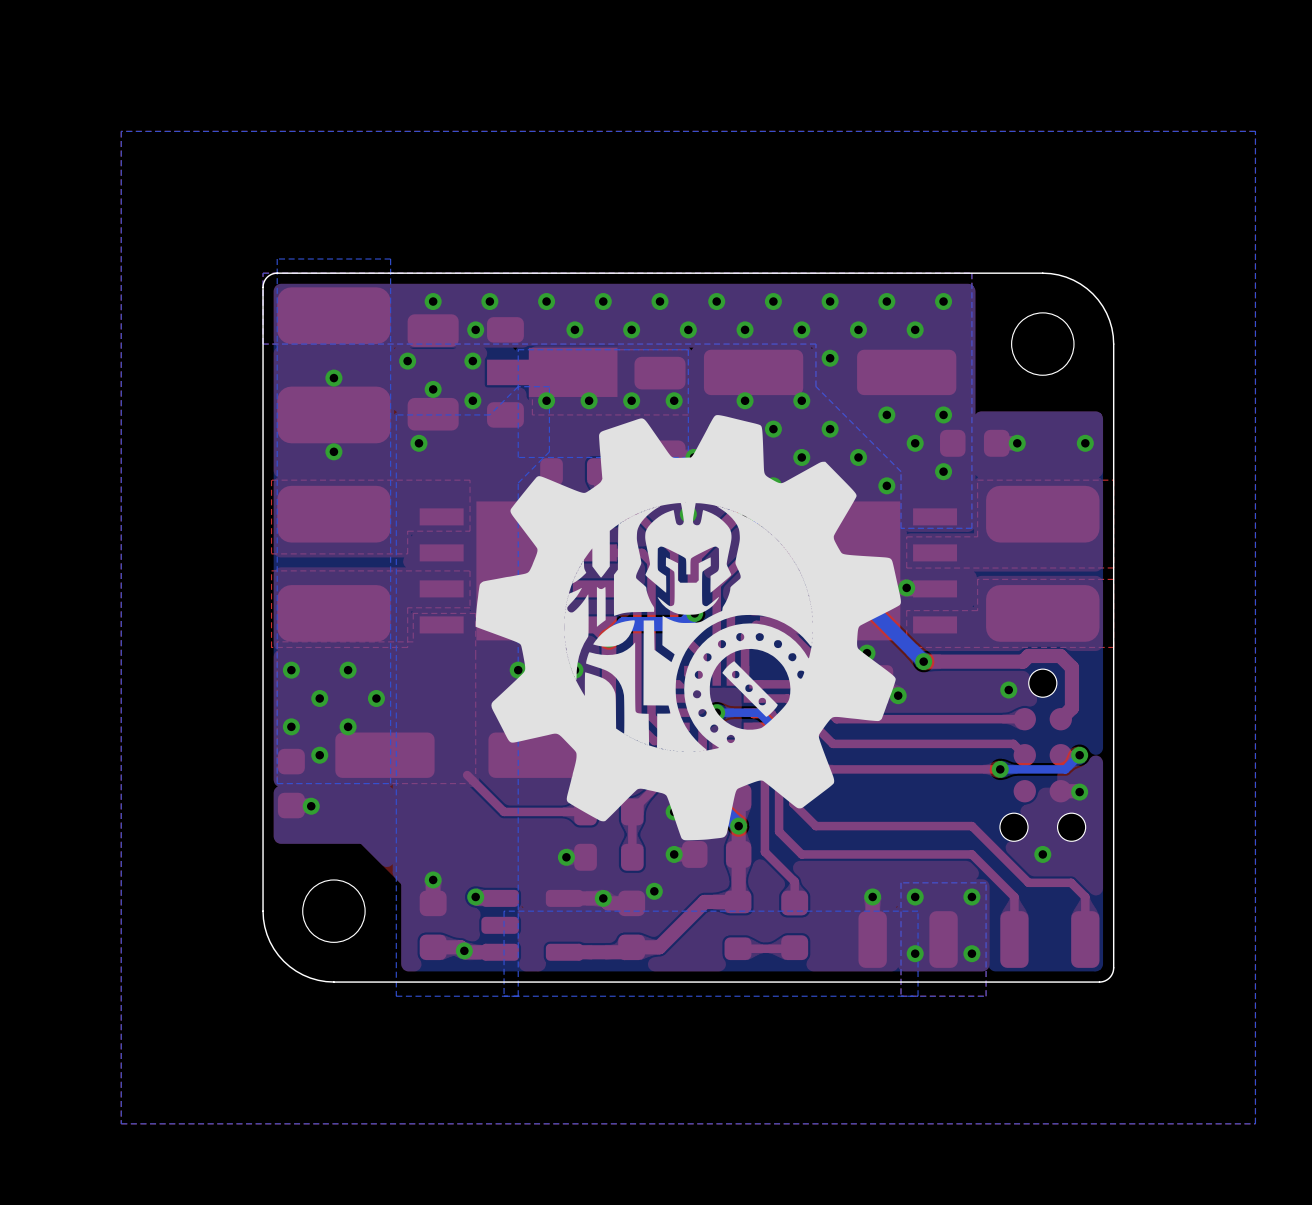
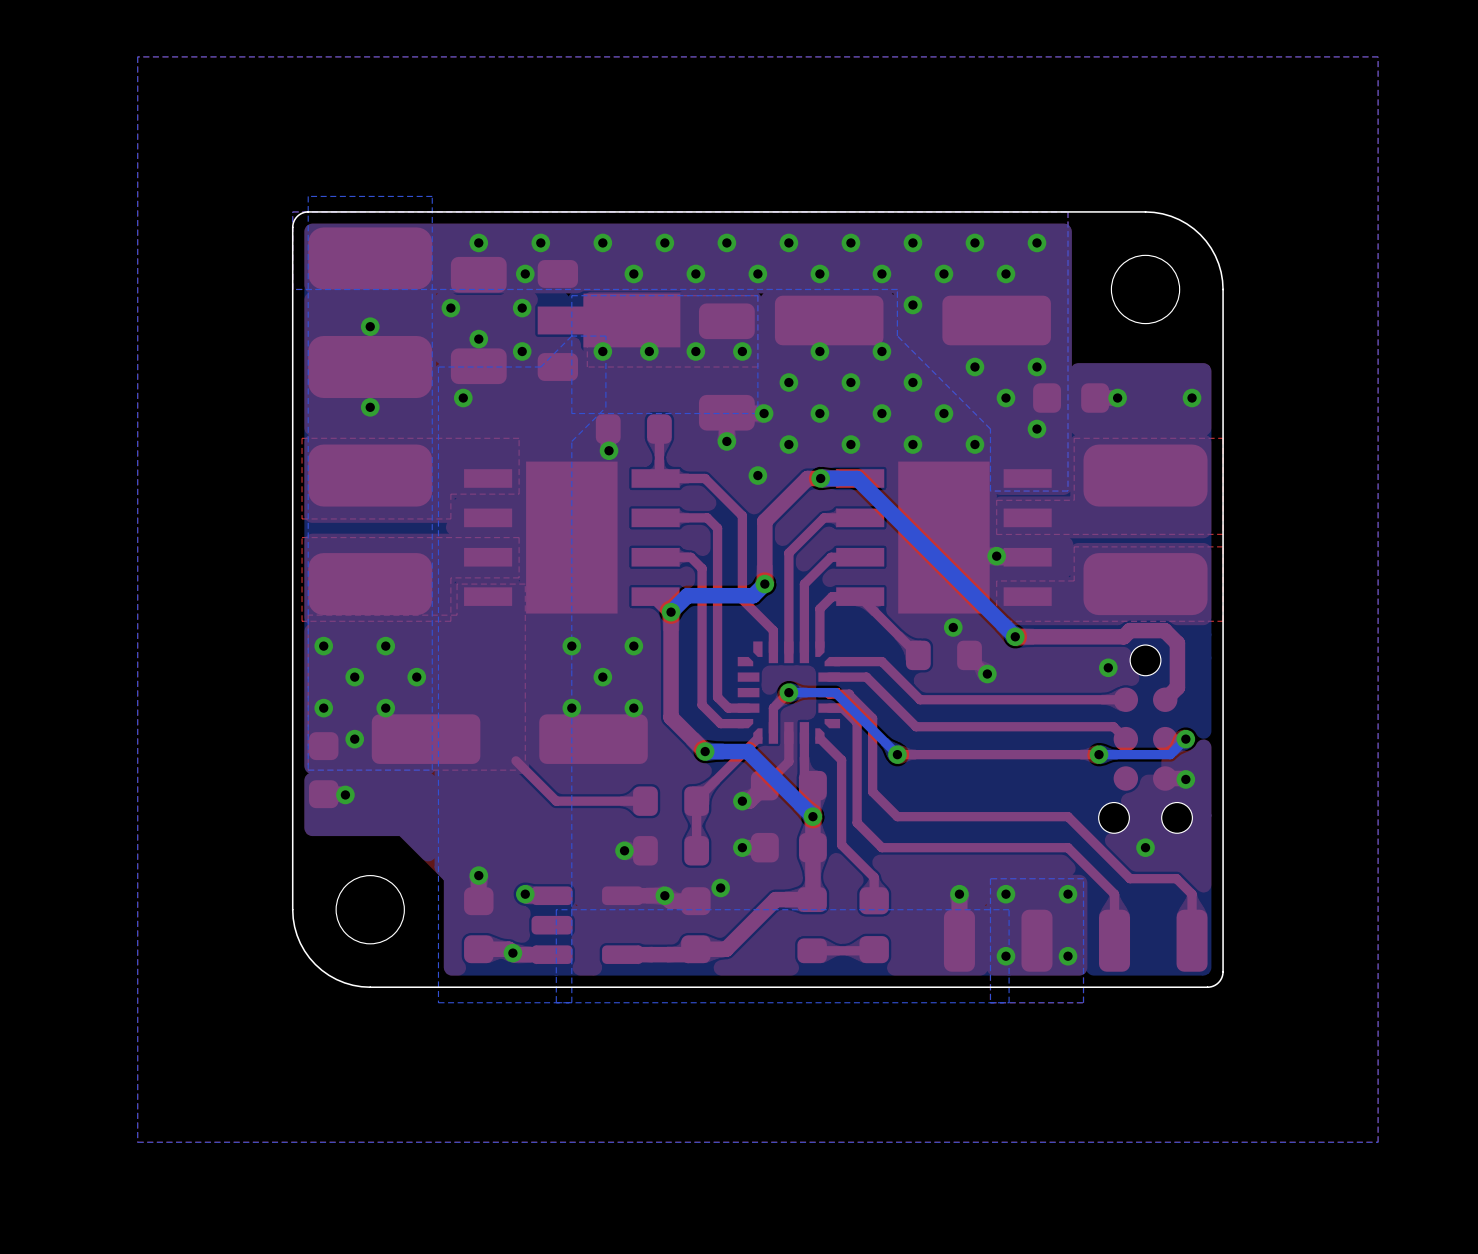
drawing: [475, 415, 901, 841] -> none

